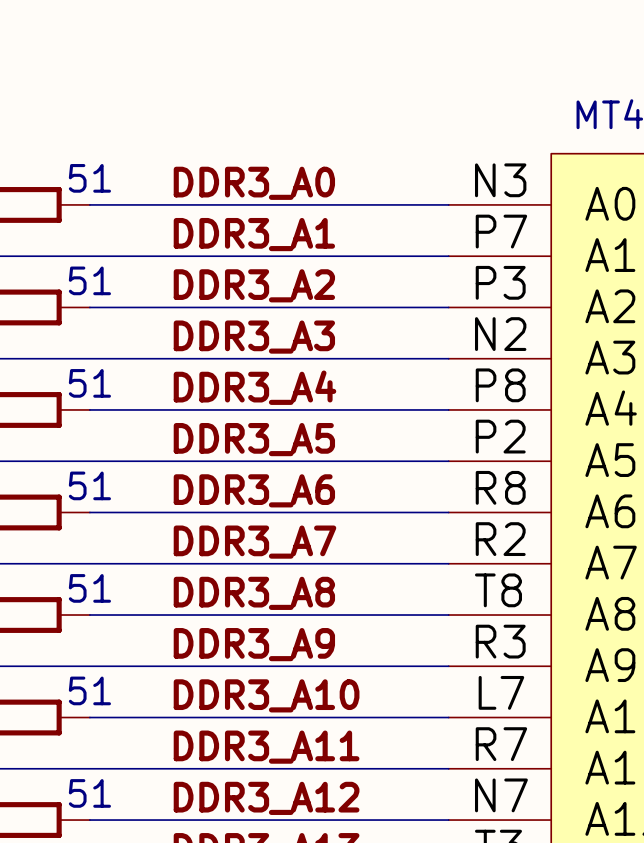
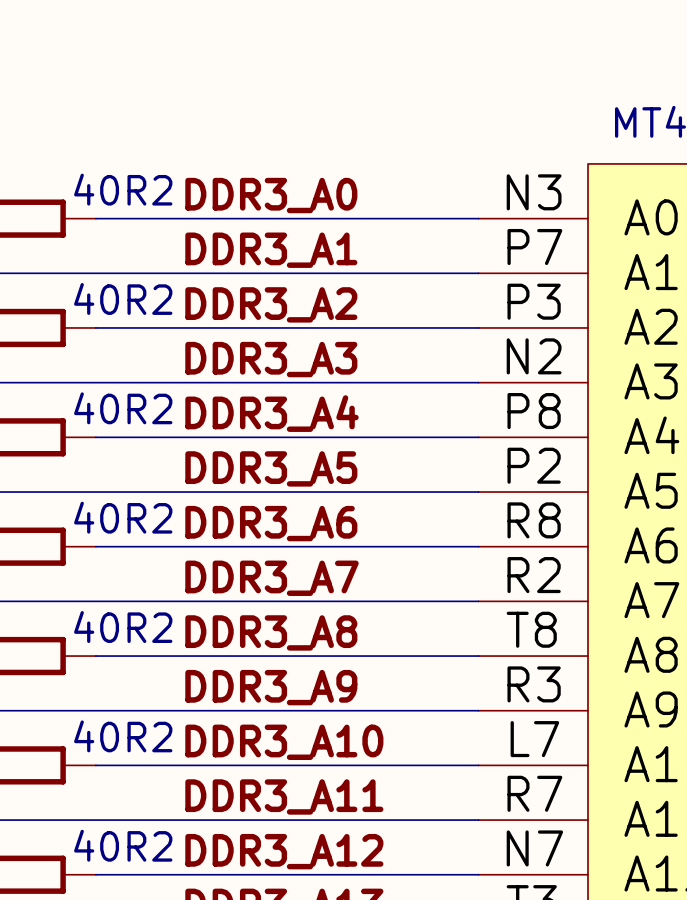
part text: 51 (89, 178) -> 40R2 (123, 189)
part text: 51 (89, 280) -> 40R2 (123, 298)
part text: 51 (89, 383) -> 40R2 (123, 408)
part text: 51 (89, 485) -> 40R2 (123, 517)
part text: 51 (89, 588) -> 40R2 (123, 627)
part text: 51 (89, 690) -> 40R2 (123, 736)
part text: 51 (89, 793) -> 40R2 (123, 845)

